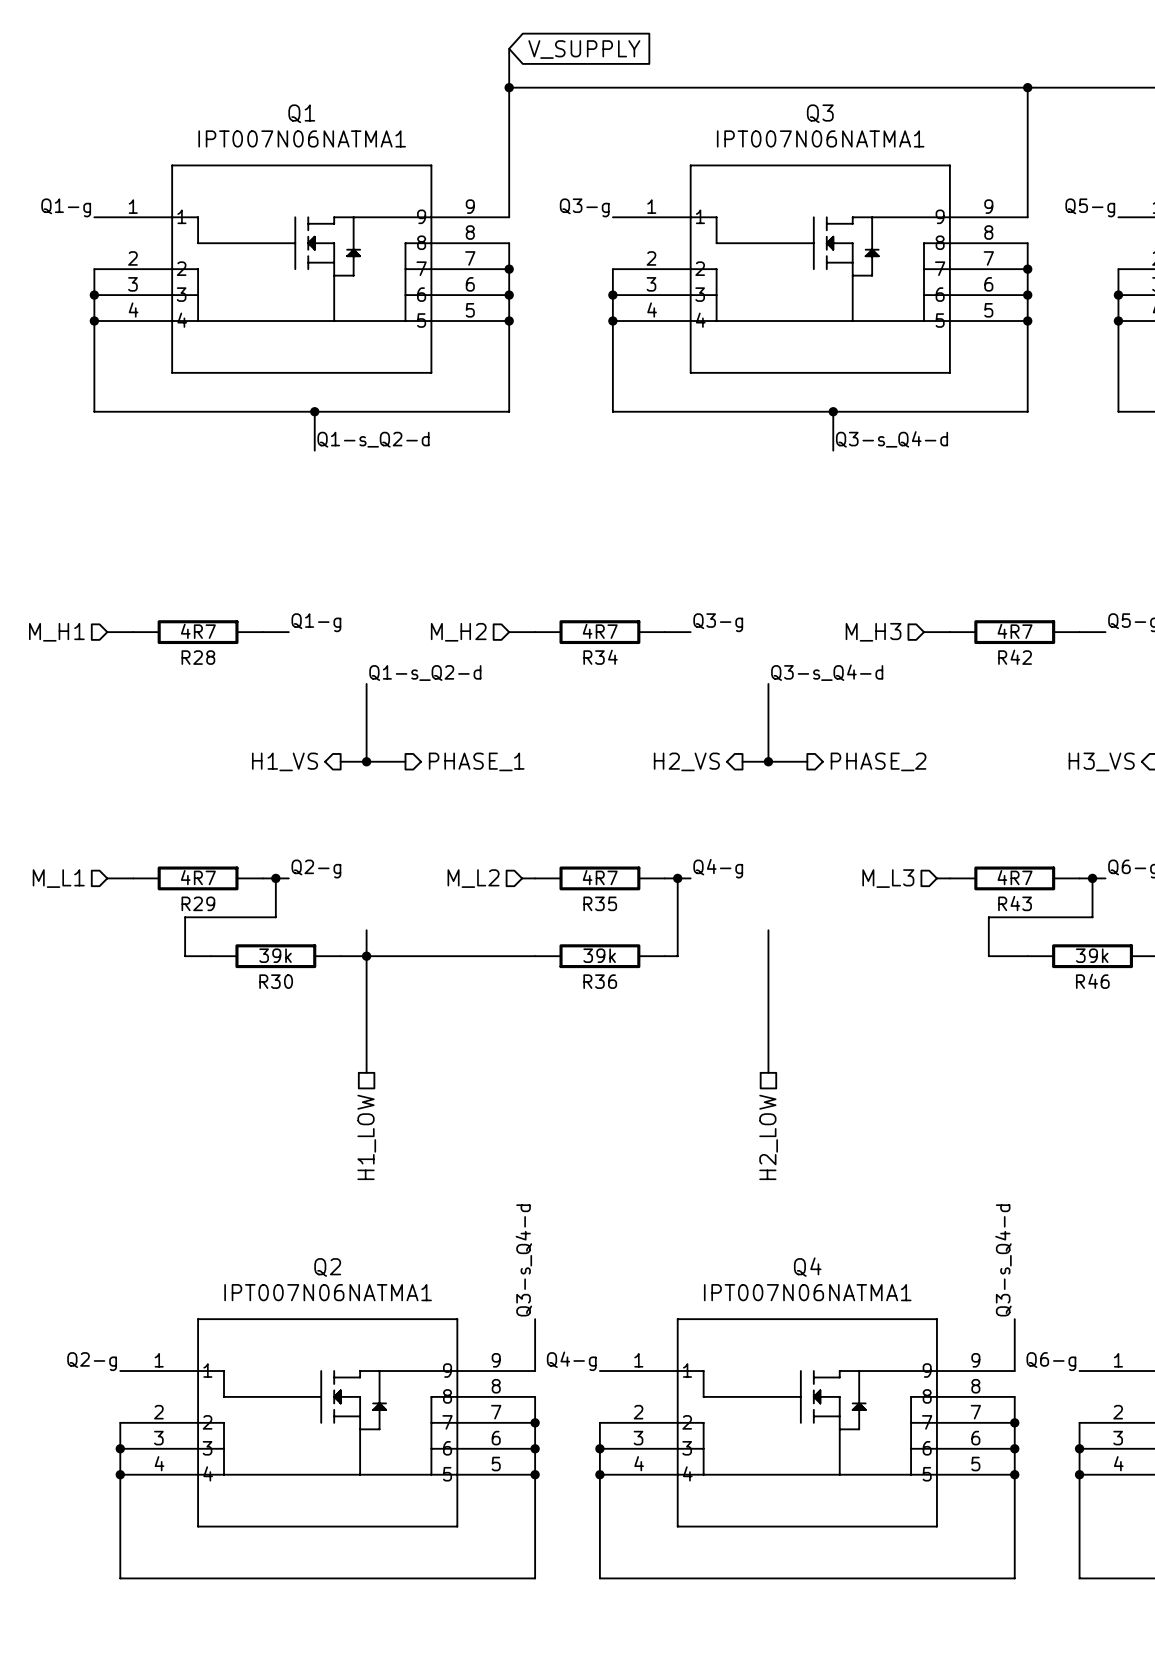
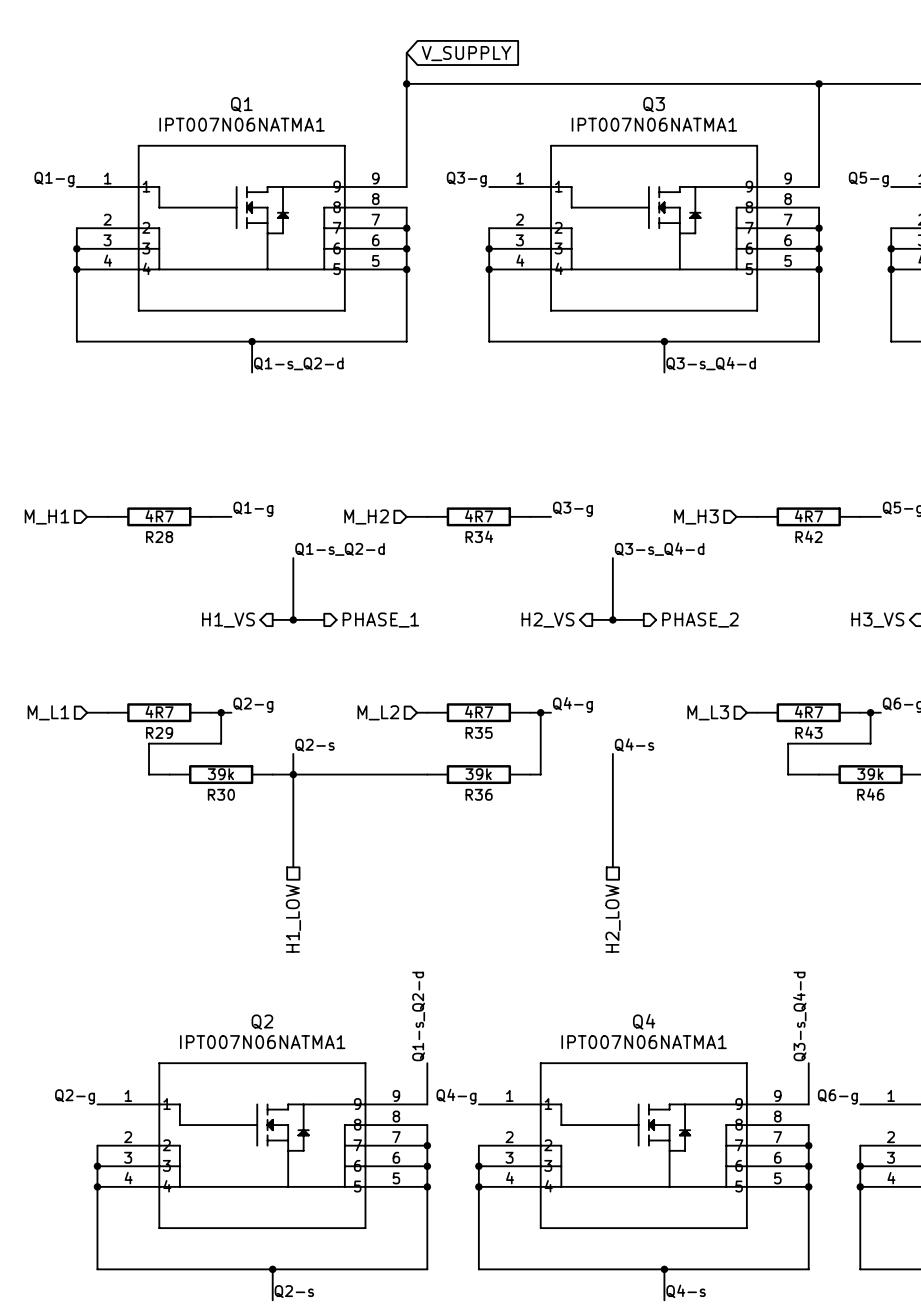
label: none -> Q2-s (315, 745)
label: none -> Q4-s (634, 744)
label: Q3-s_Q4-d (523, 1260) -> Q1-s_Q2-d (418, 1016)
wire: none -> (272, 1269) (272, 1300)
junction: none -> (272, 1269)
wire: none -> (664, 1269) (664, 1300)
junction: none -> (664, 1269)
label: none -> Q2-s (294, 1291)
label: none -> Q4-s (686, 1291)

